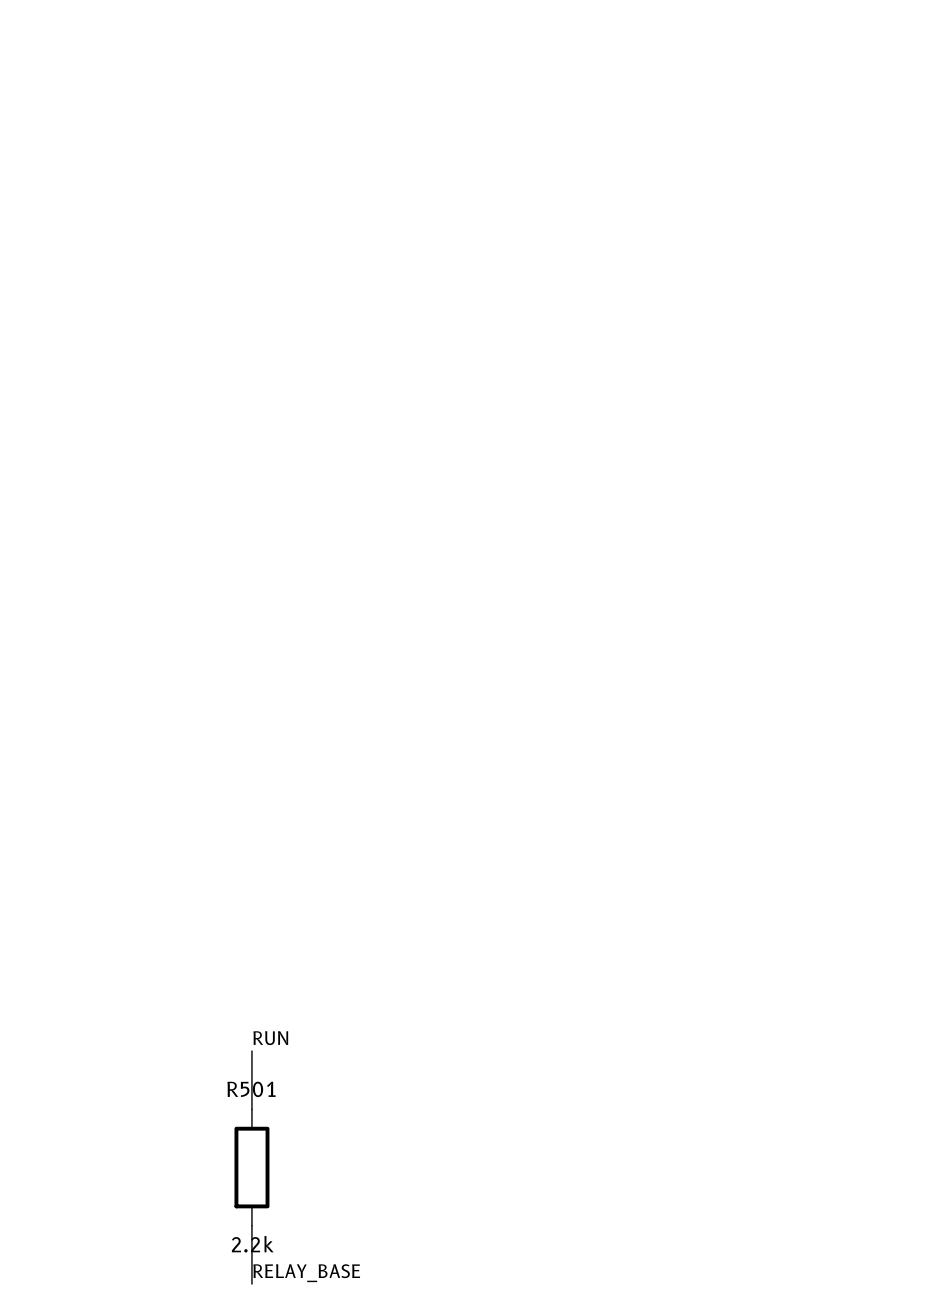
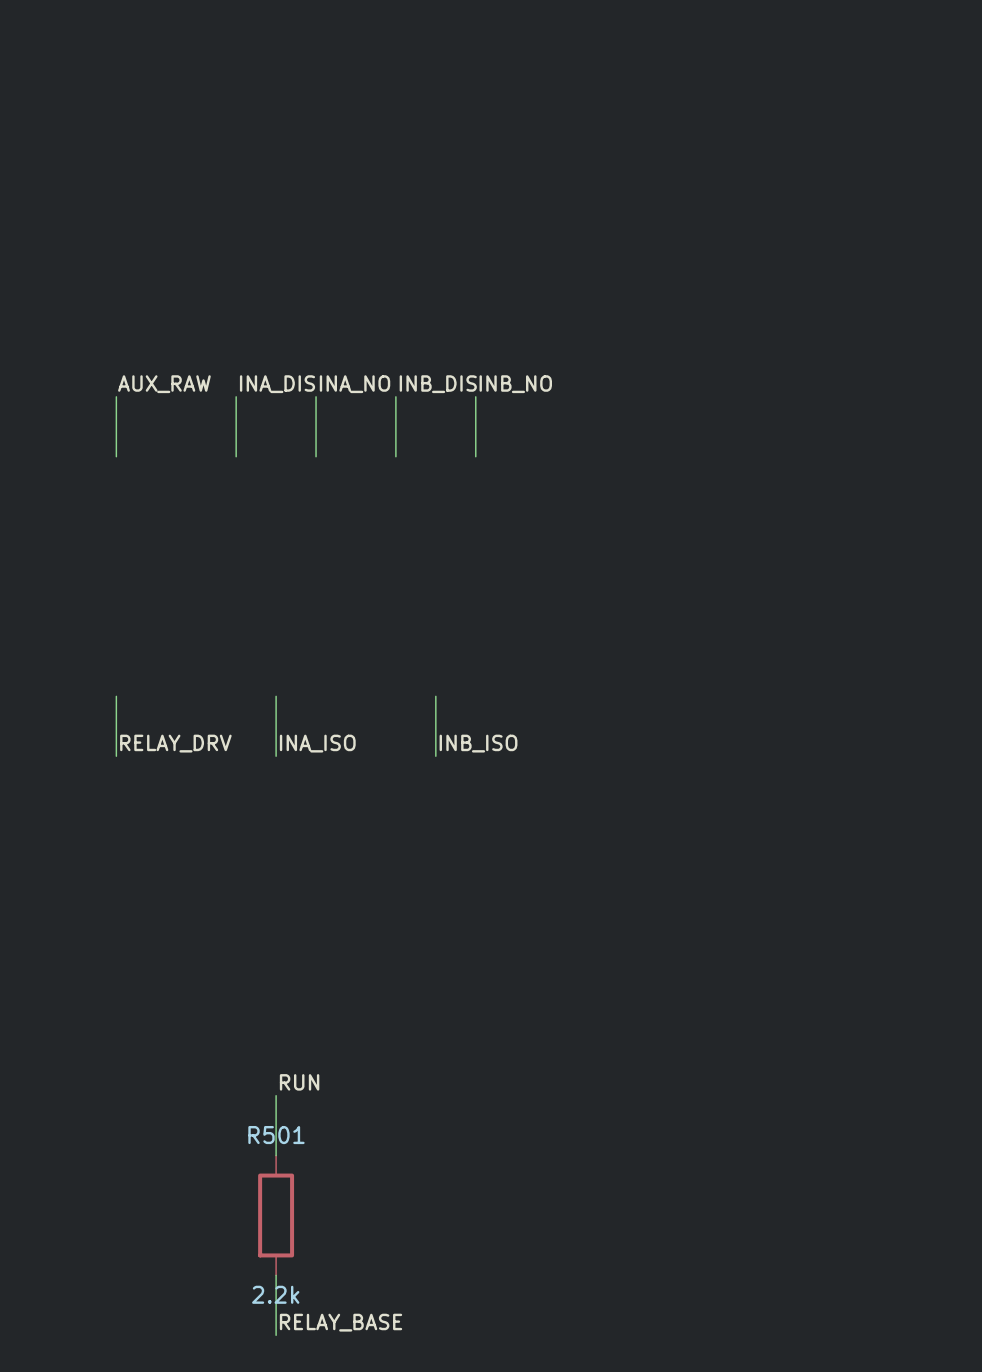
label: none -> AUX_RAW (164, 384)
label: none -> INA_DIS (277, 384)
label: none -> INA_NO (355, 384)
label: none -> INB_DIS (438, 384)
label: none -> INB_NO (515, 384)
wire: none -> (116, 396) (116, 456)
wire: none -> (236, 396) (236, 456)
wire: none -> (316, 396) (316, 456)
wire: none -> (395, 396) (395, 456)
wire: none -> (475, 396) (475, 456)
wire: none -> (116, 696) (116, 756)
wire: none -> (276, 696) (276, 756)
wire: none -> (435, 696) (435, 756)
label: none -> RELAY_DRV (175, 743)
label: none -> INA_ISO (317, 743)
label: none -> INB_ISO (478, 743)

